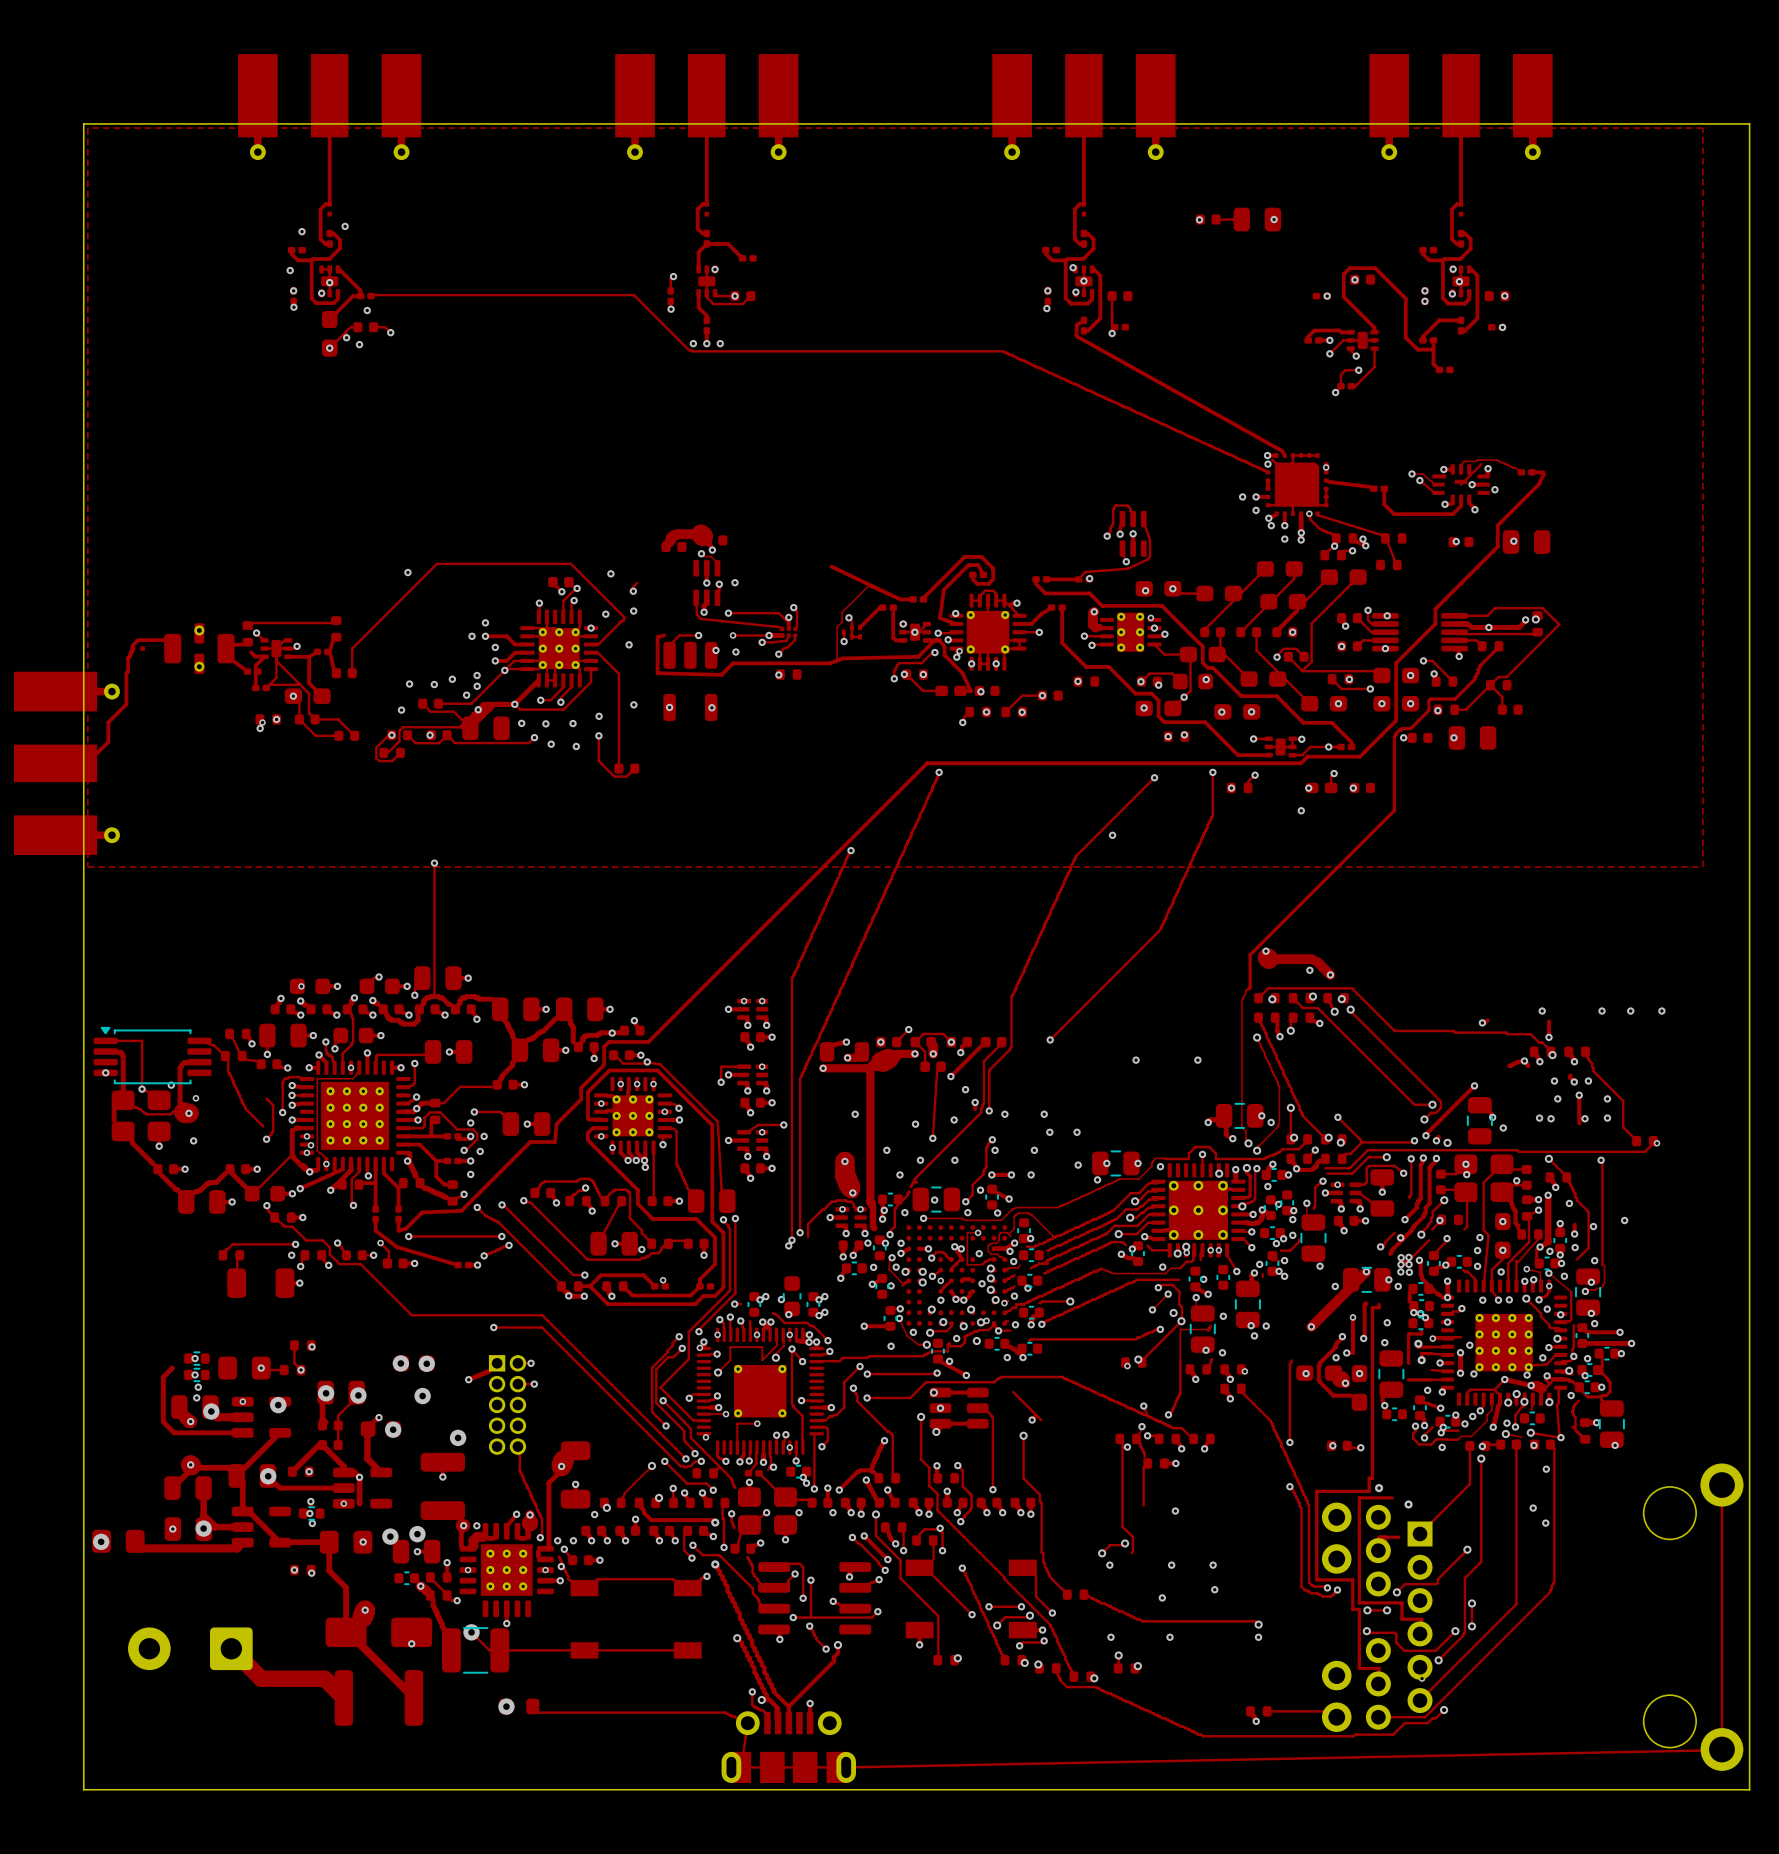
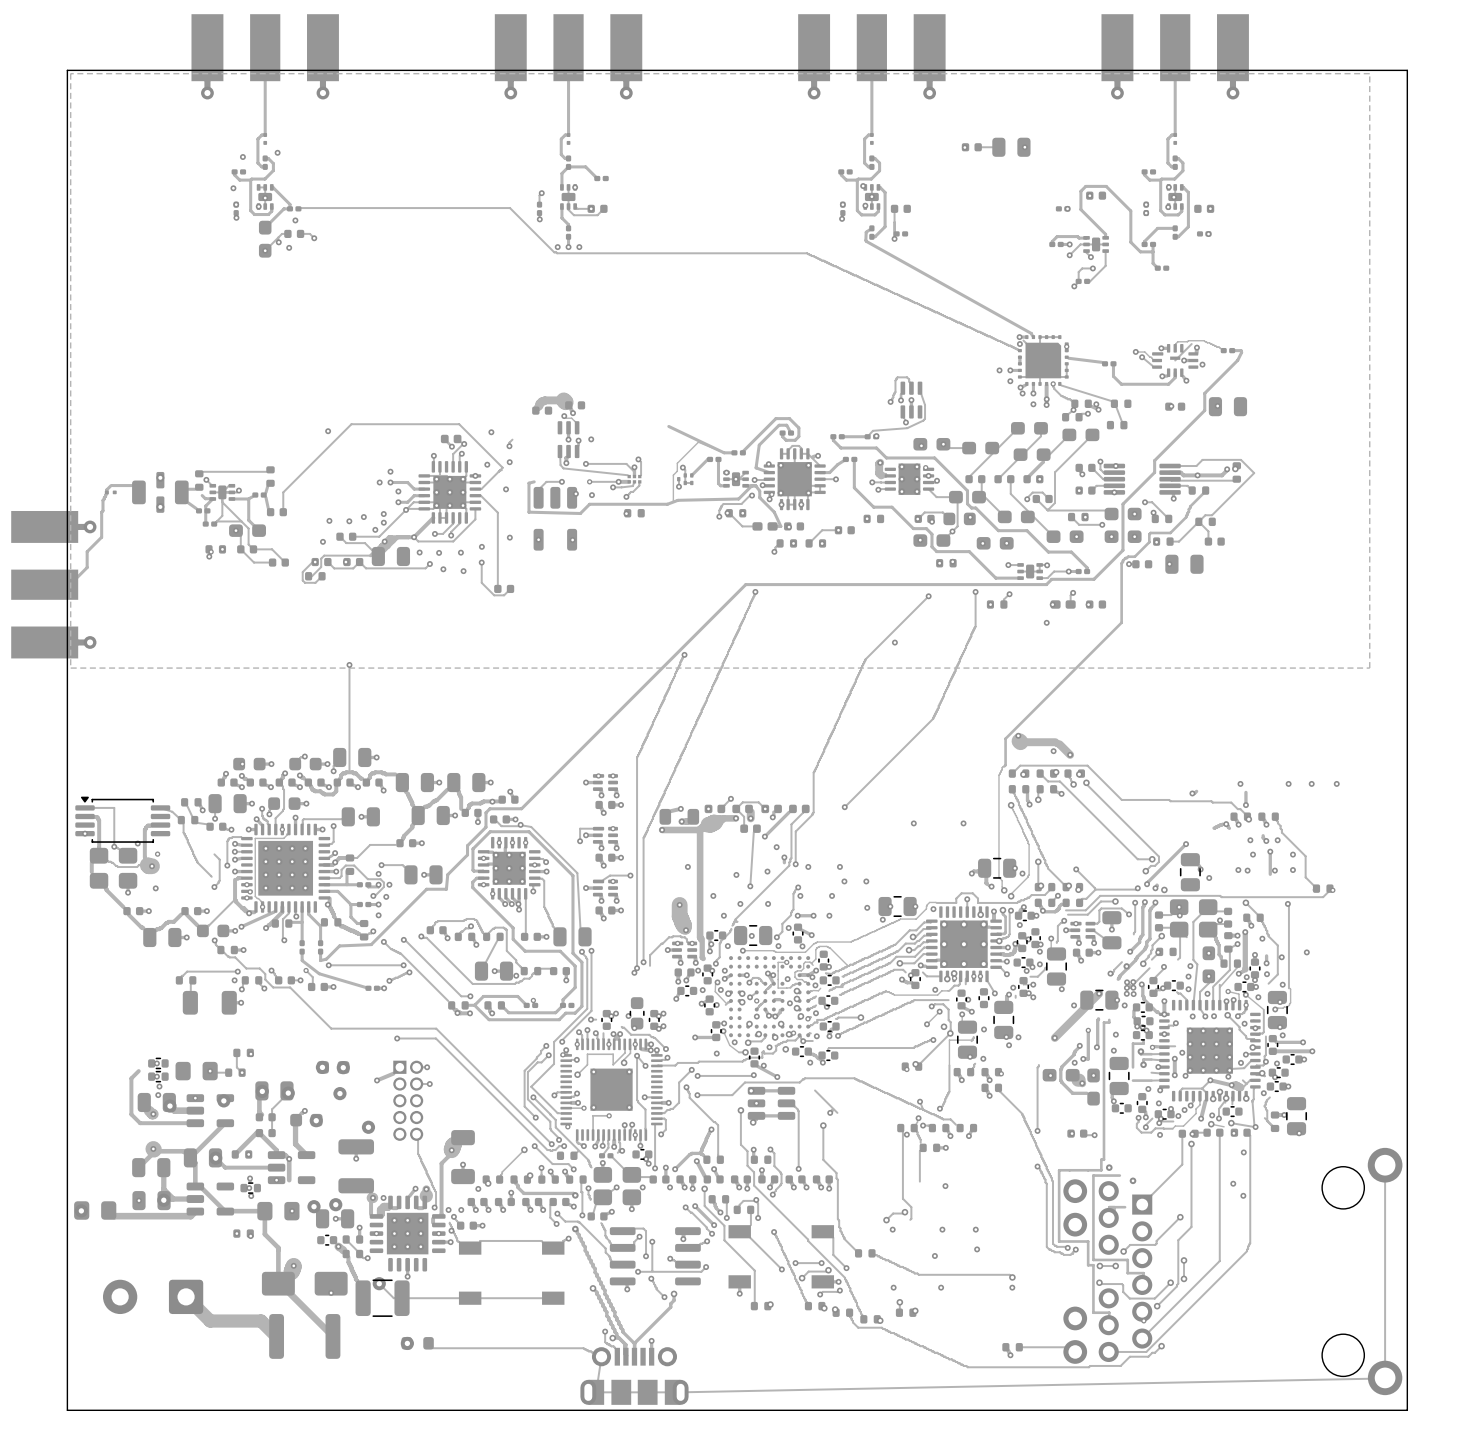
track: (1537, 1249) (1536, 1258) -> none
track: (1602, 1357) (1602, 1373) (1610, 1382) (1610, 1391) (1606, 1395) (1587, 1396) (1572, 1381) (1551, 1378) (1547, 1375) -> none
via: (1547, 1375) -> none
track: (1601, 1396) (1602, 1401) -> none
track: (1424, 1403) (1437, 1407) -> none

